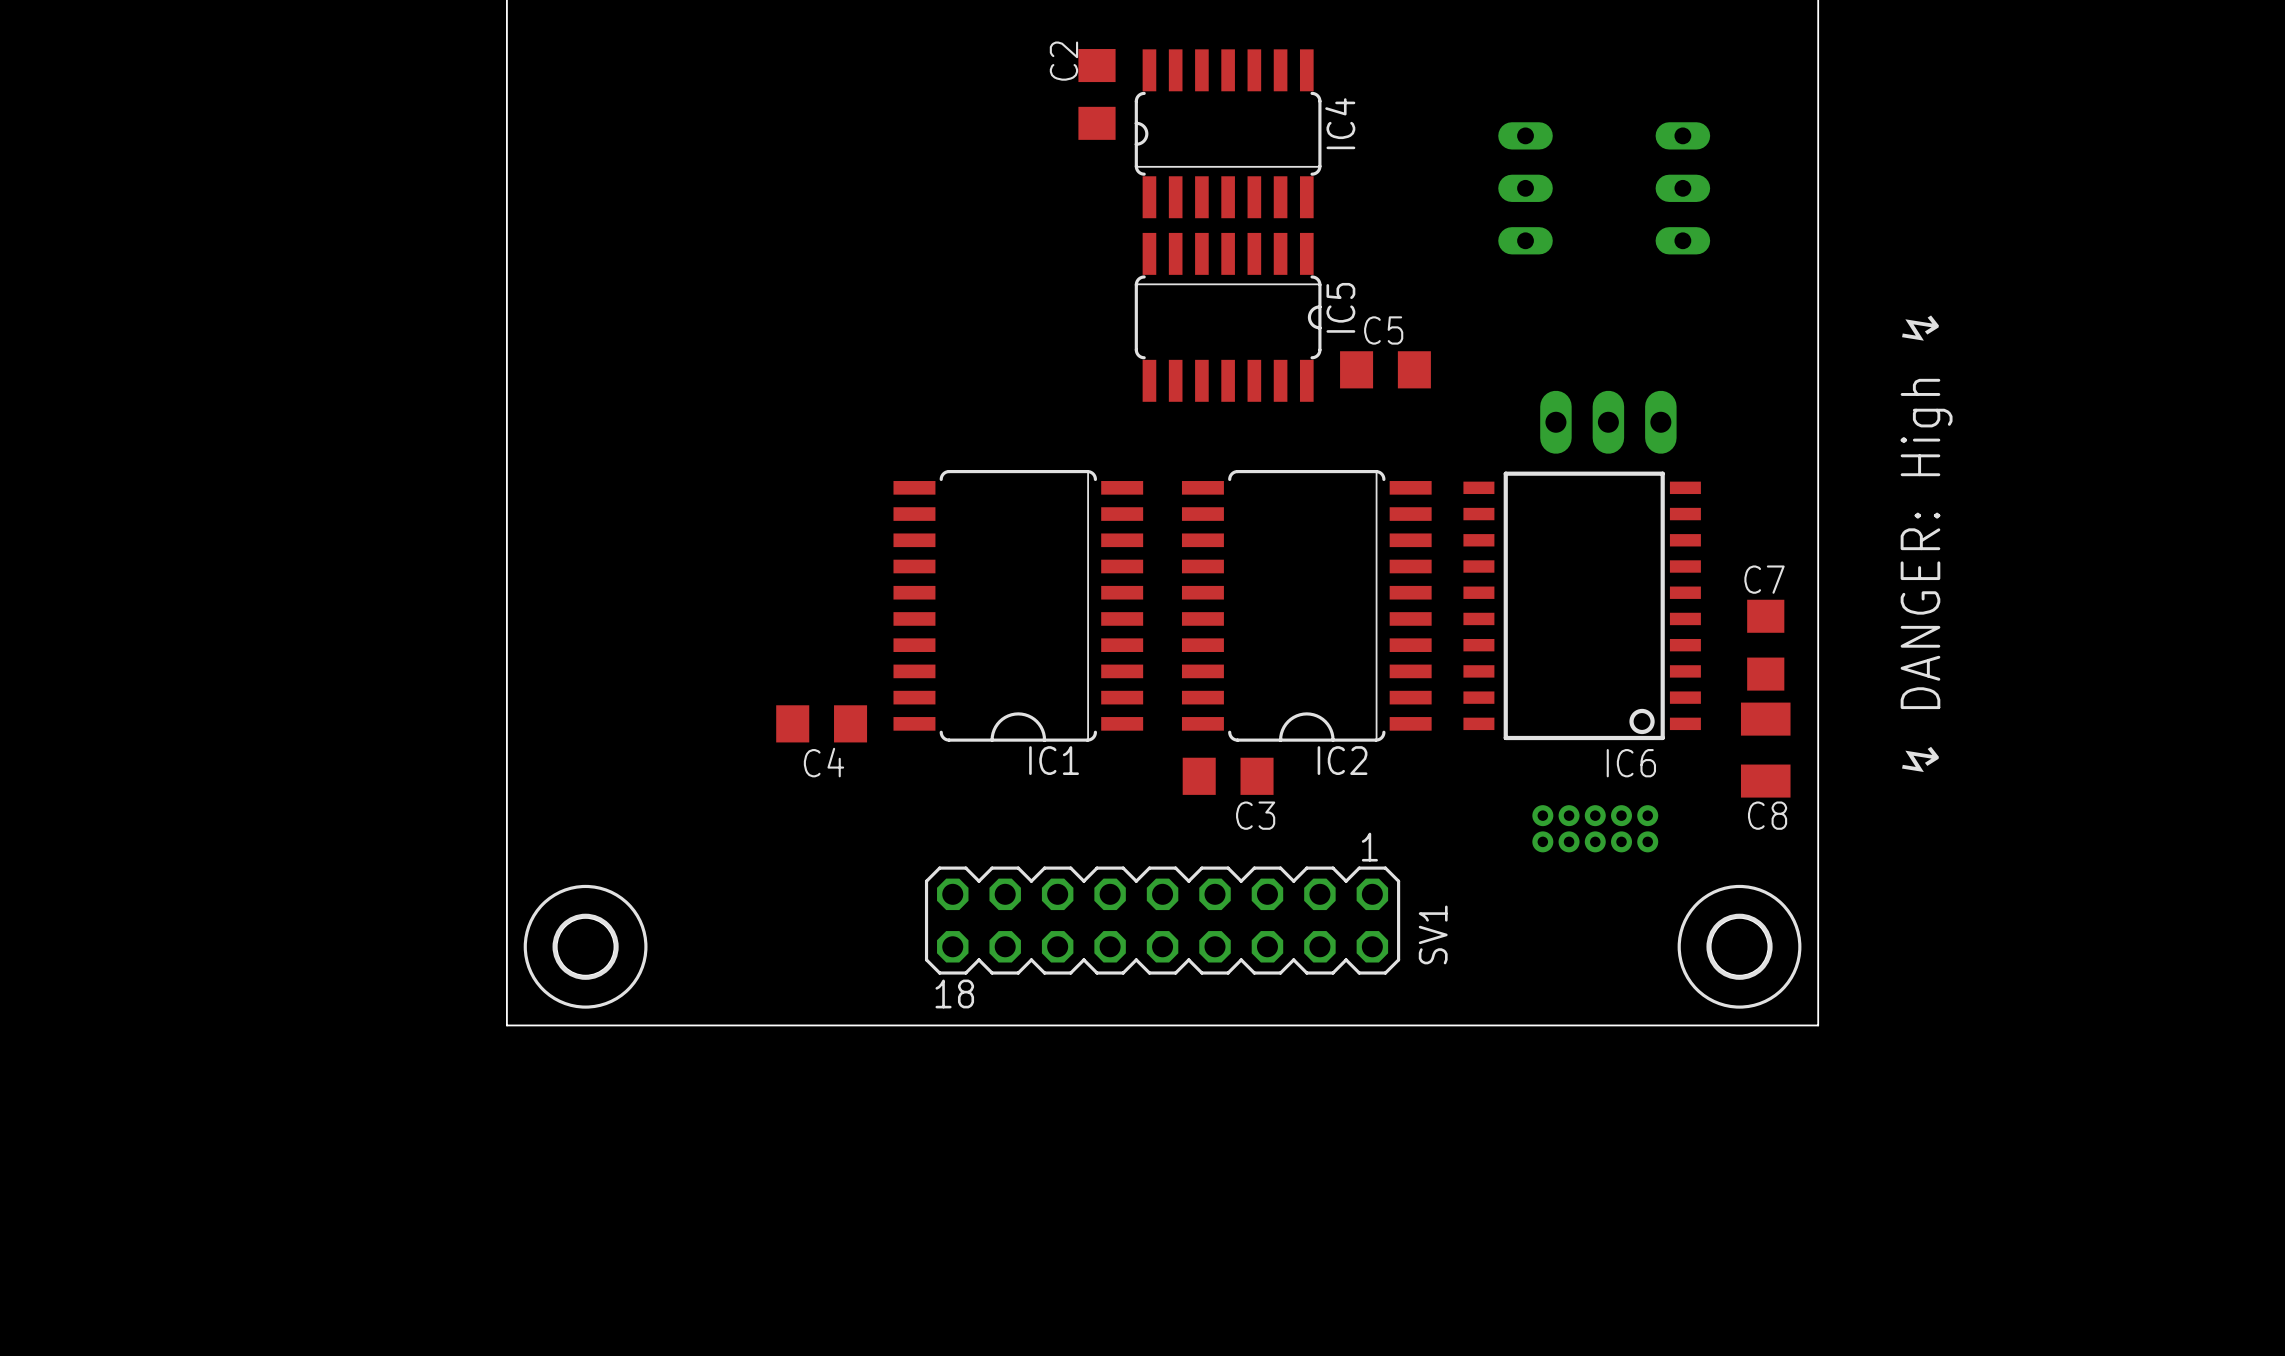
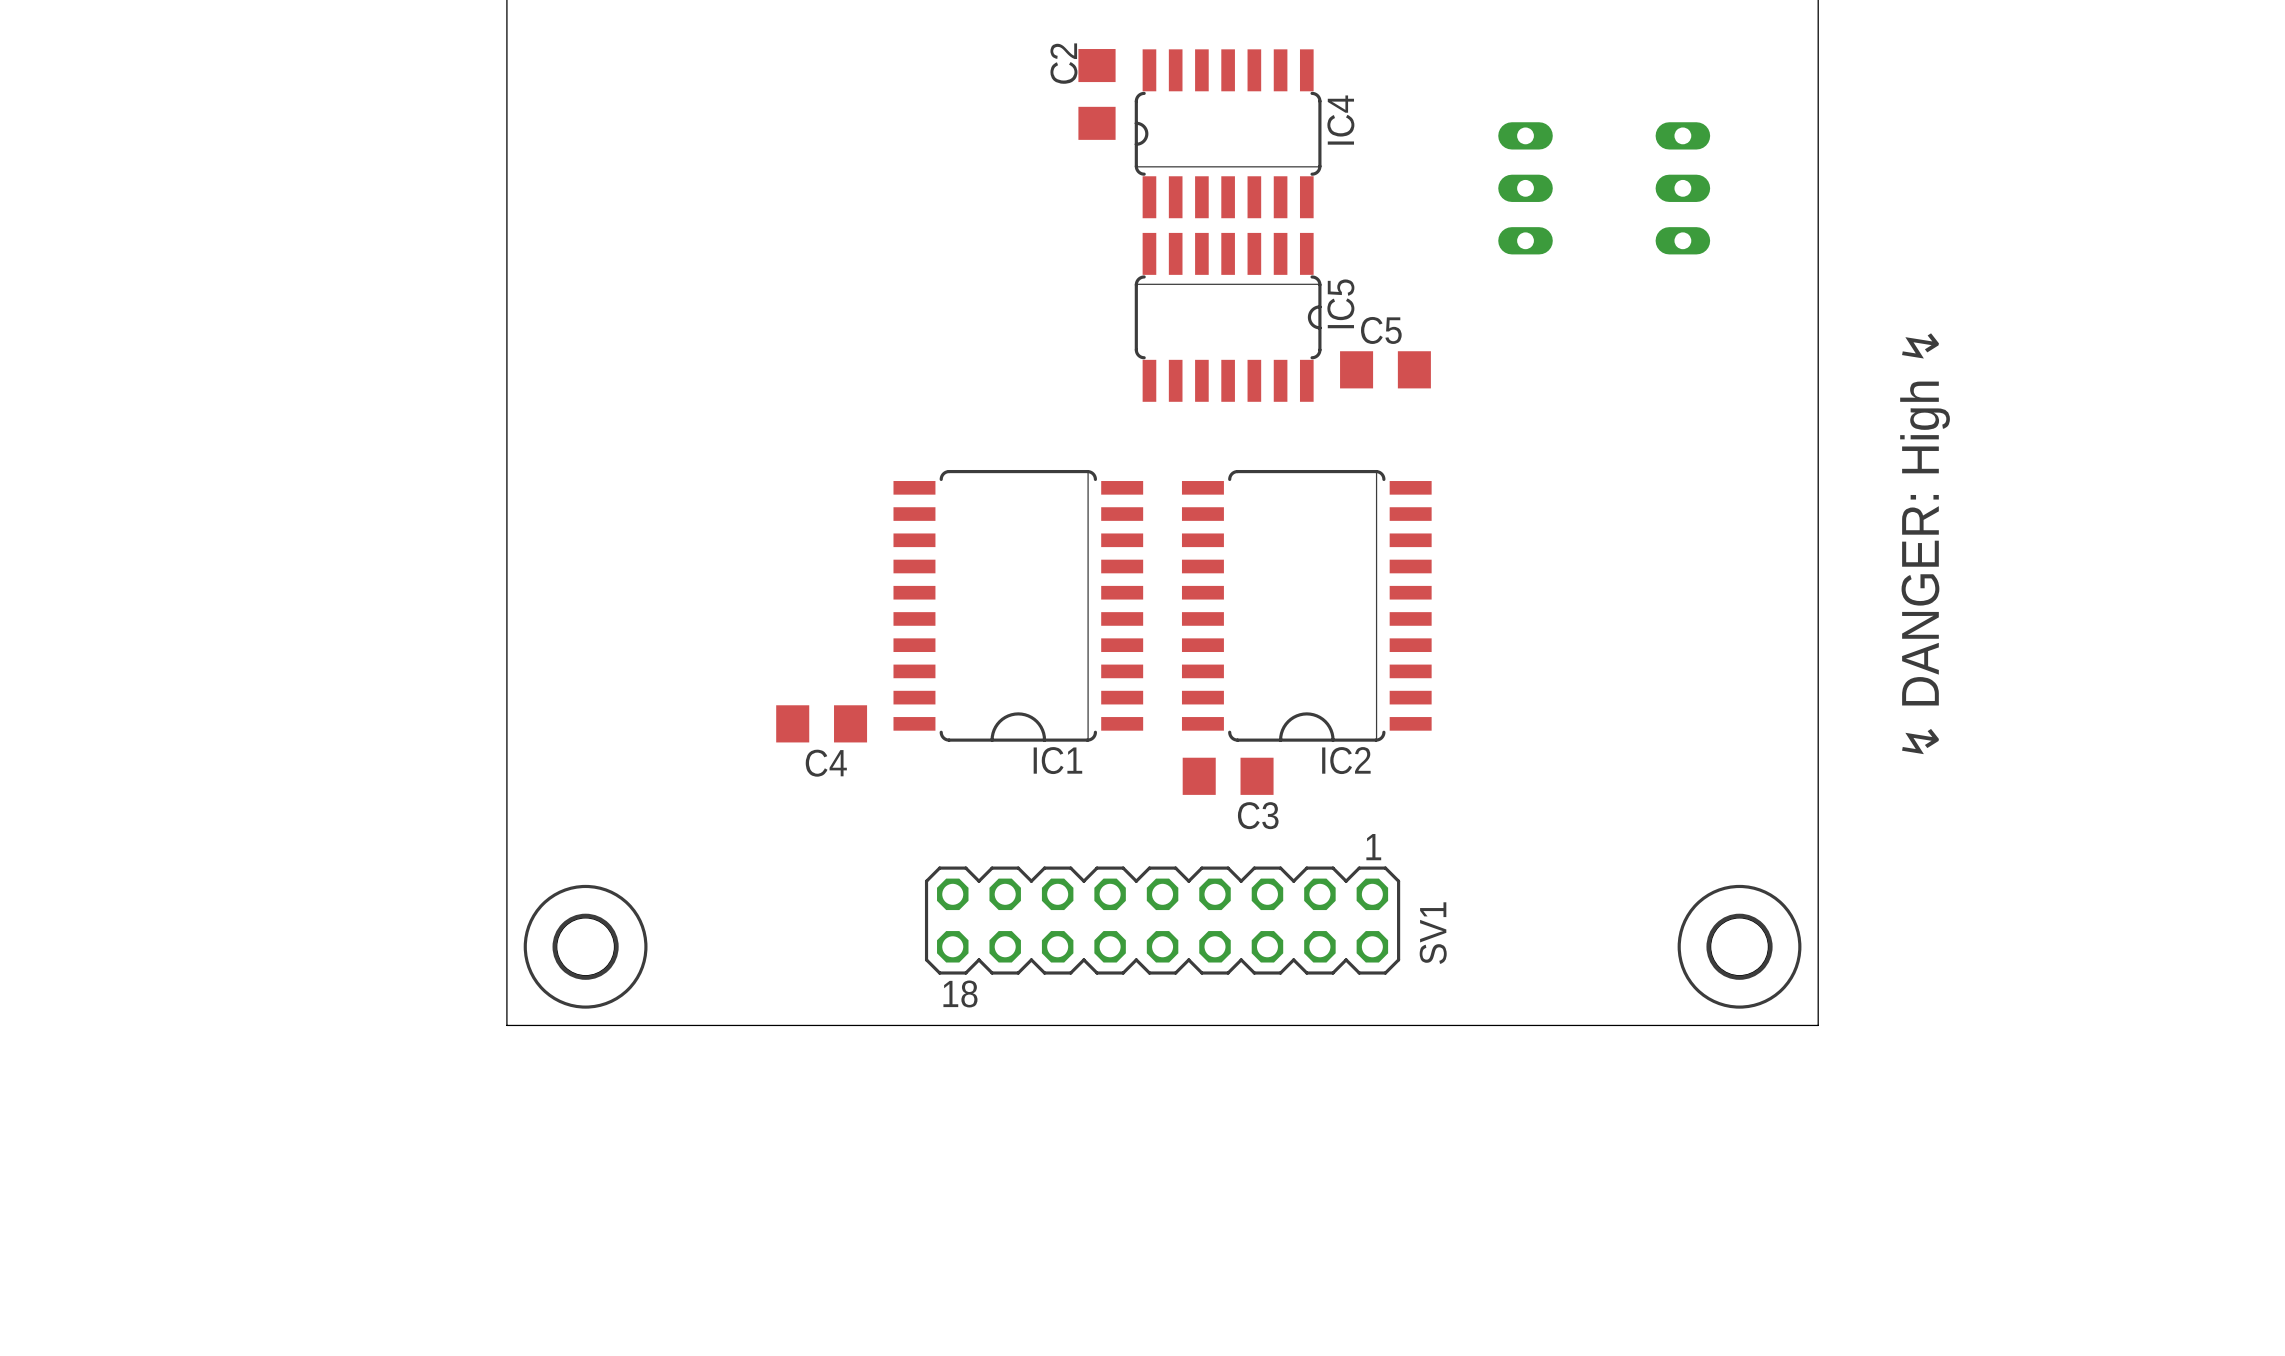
part: (1608, 422) -> none
IC6: (1582, 605) -> none
C7: (1765, 645) -> none
C8: (1765, 750) -> none
part: (1595, 828) -> none

